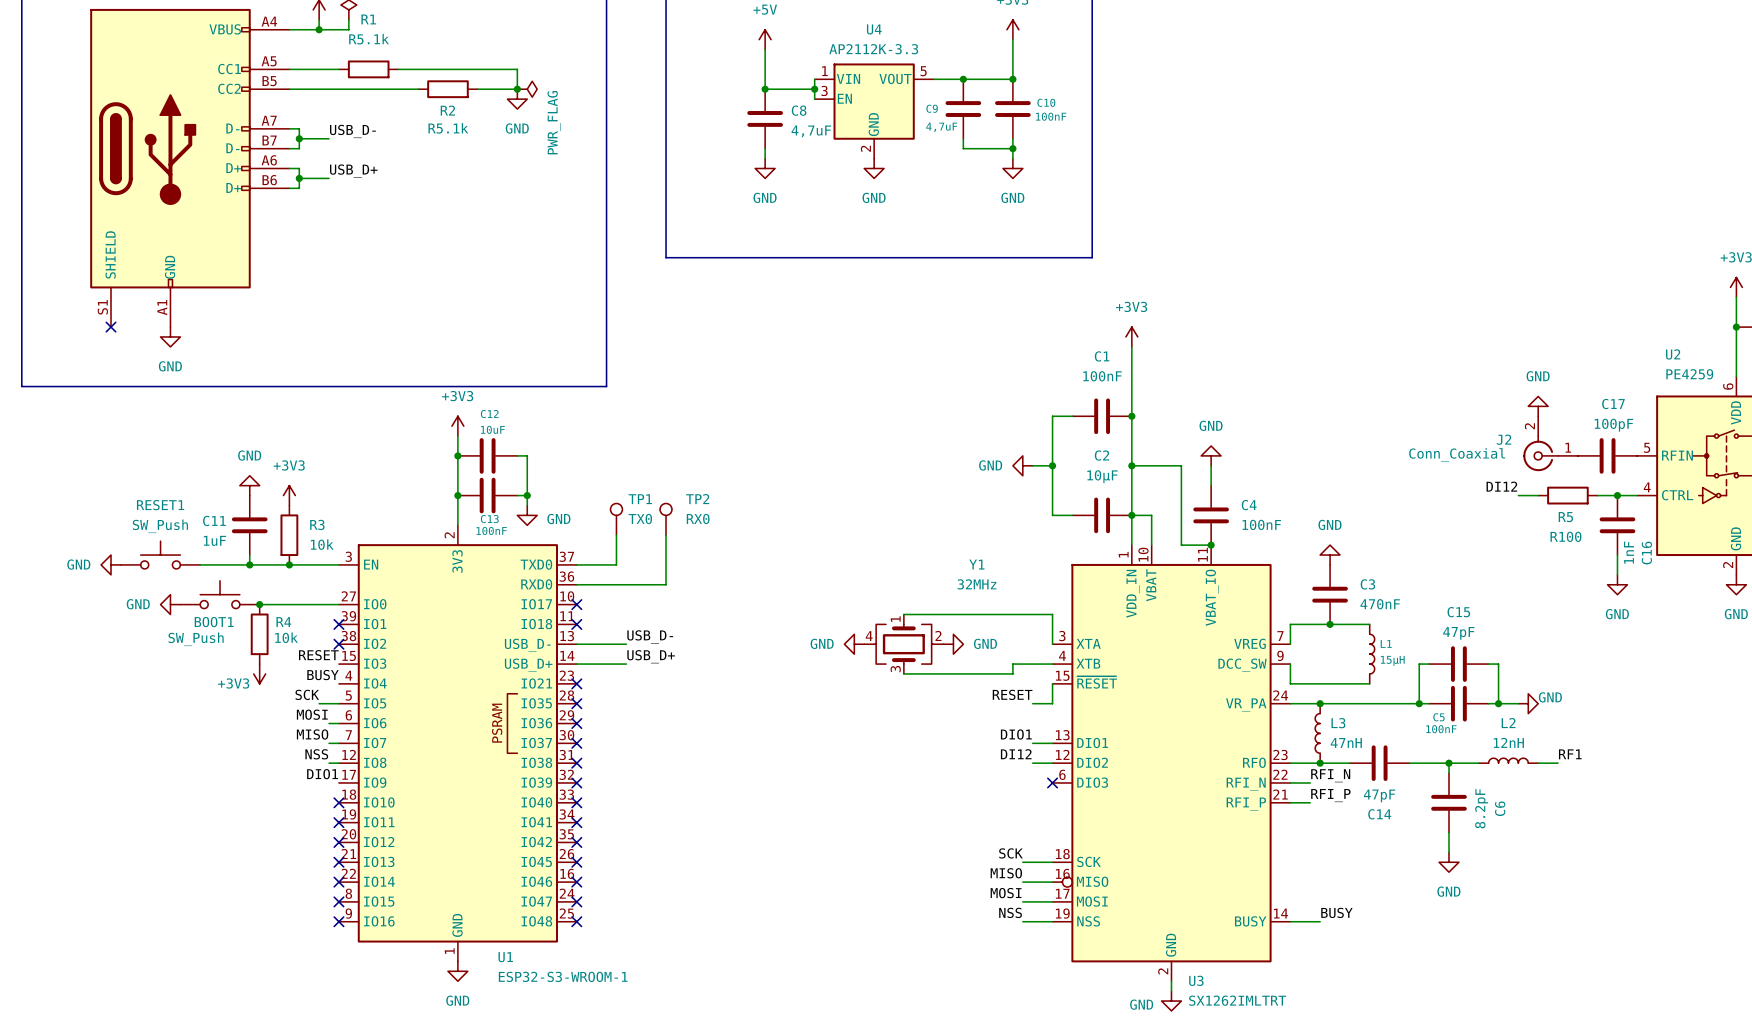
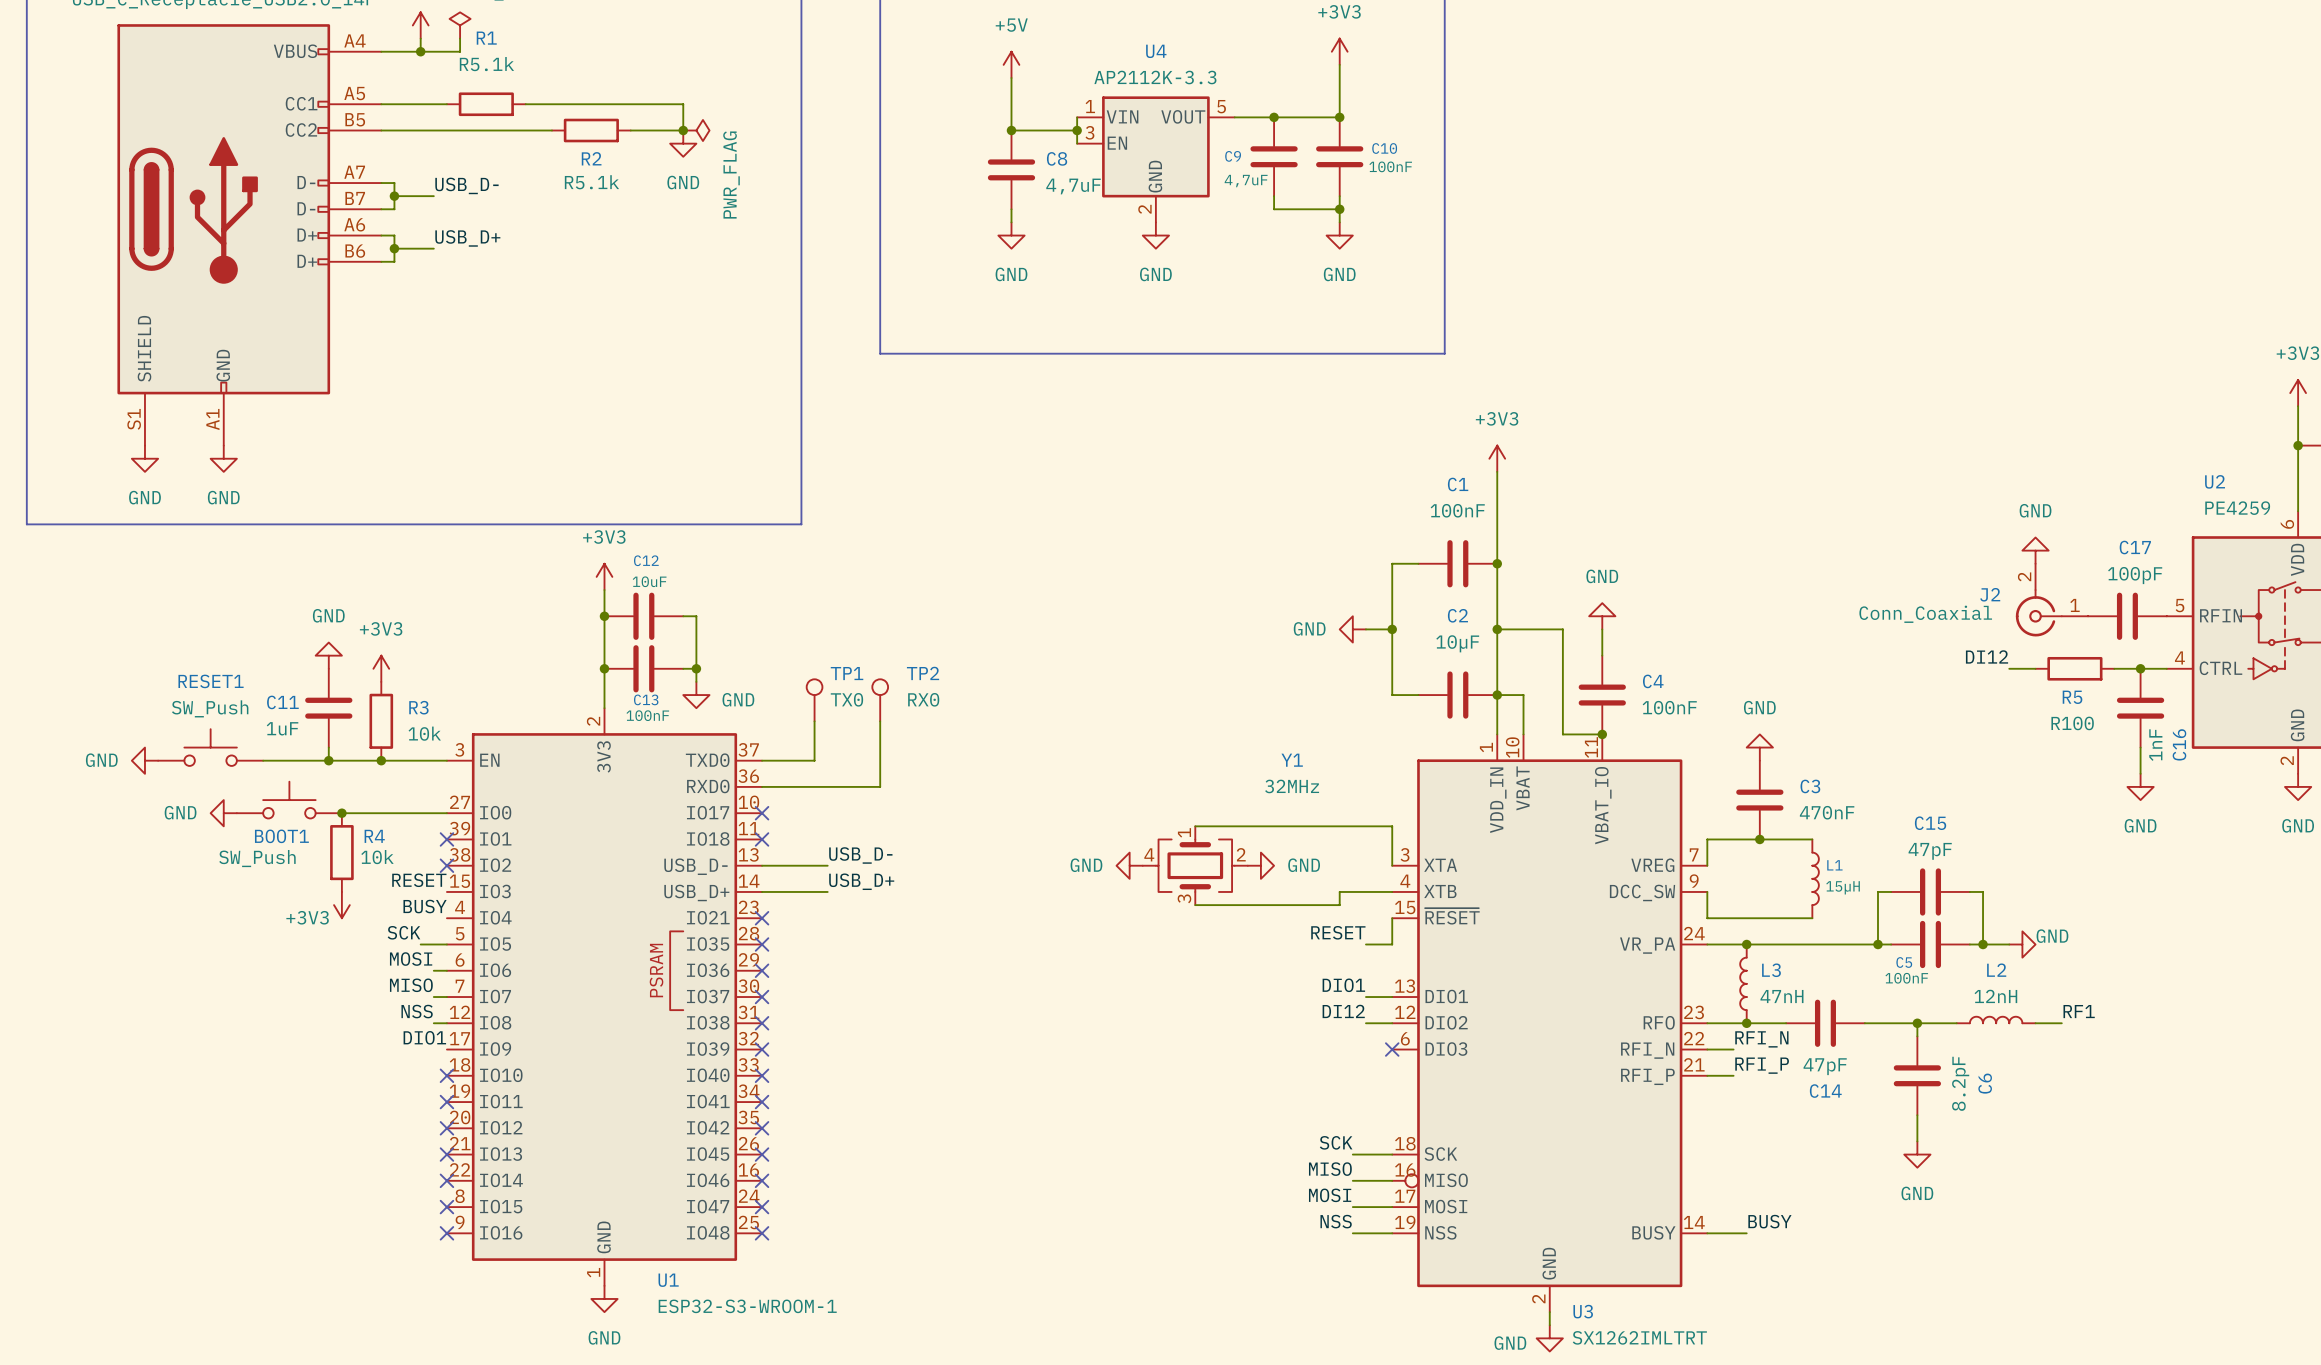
no-connect mark: (111, 327) -> none
power symbol: none -> GND (144, 458)

